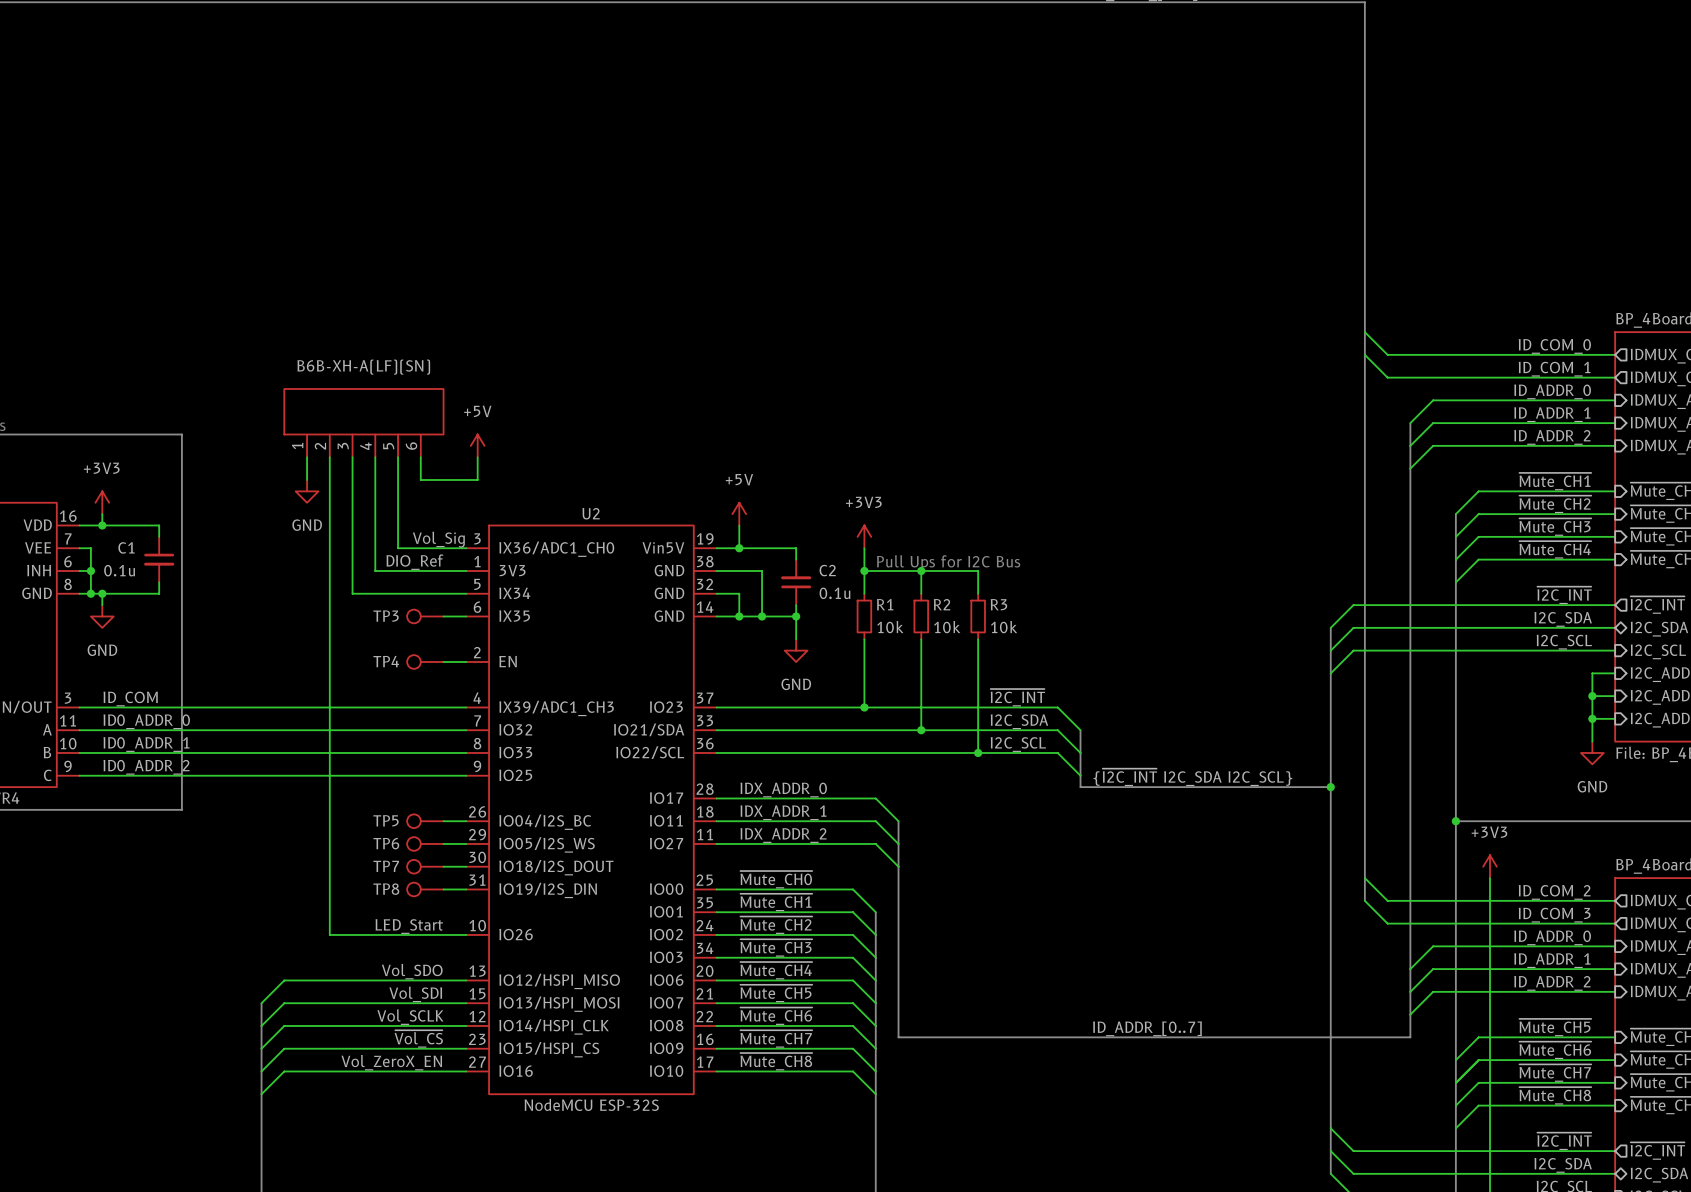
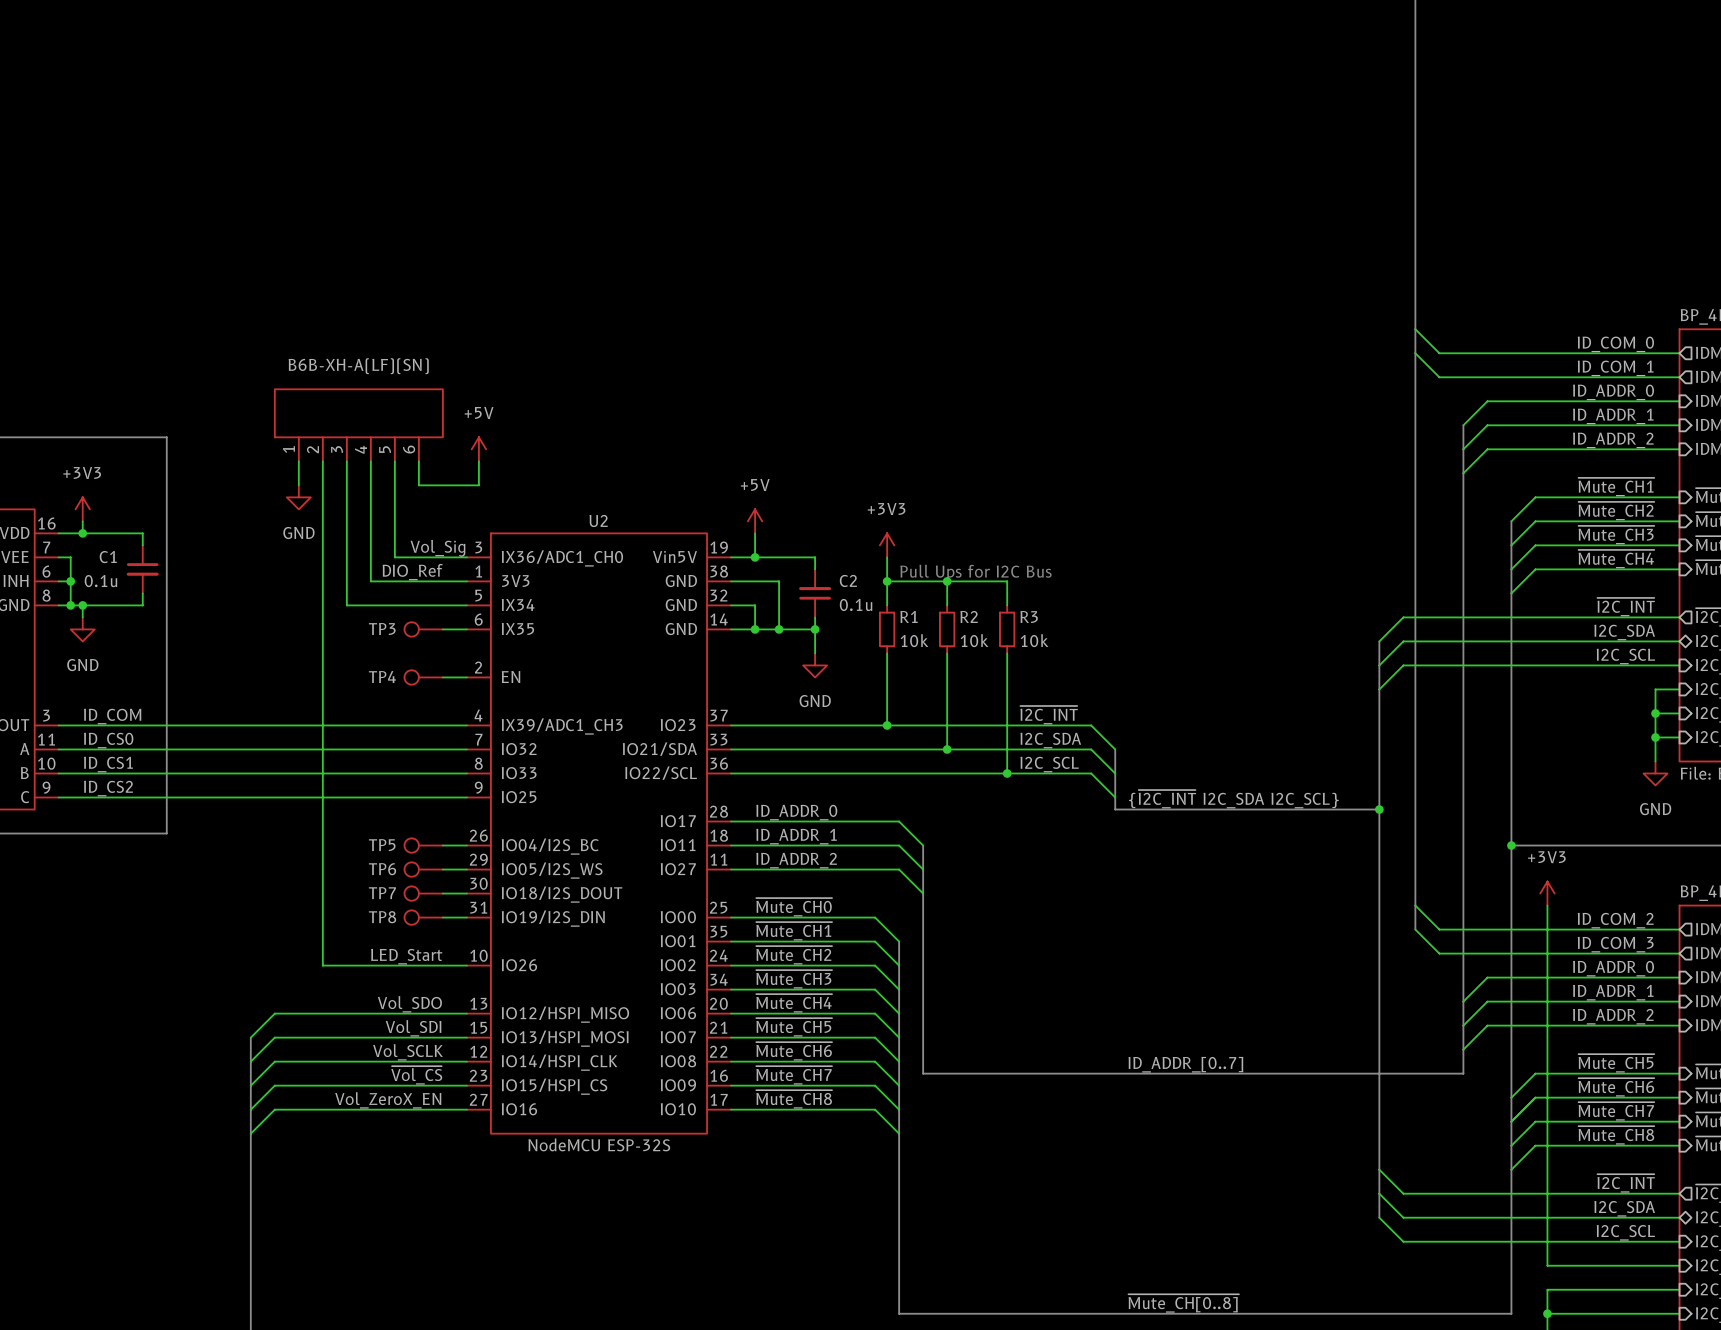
label: ID0_ADDR_0 (146, 721) -> ID_CS0 (108, 740)
label: ID0_ADDR_1 (146, 744) -> ID_CS1 (108, 764)
label: ID0_ADDR_2 (146, 767) -> ID_CS2 (108, 788)
label: IDX_ADDR_0 (783, 790) -> ID_ADDR_0 (796, 812)
label: IDX_ADDR_1 (783, 812) -> ID_ADDR_1 (796, 836)
label: IDX_ADDR_2 (783, 835) -> ID_ADDR_2 (796, 860)

